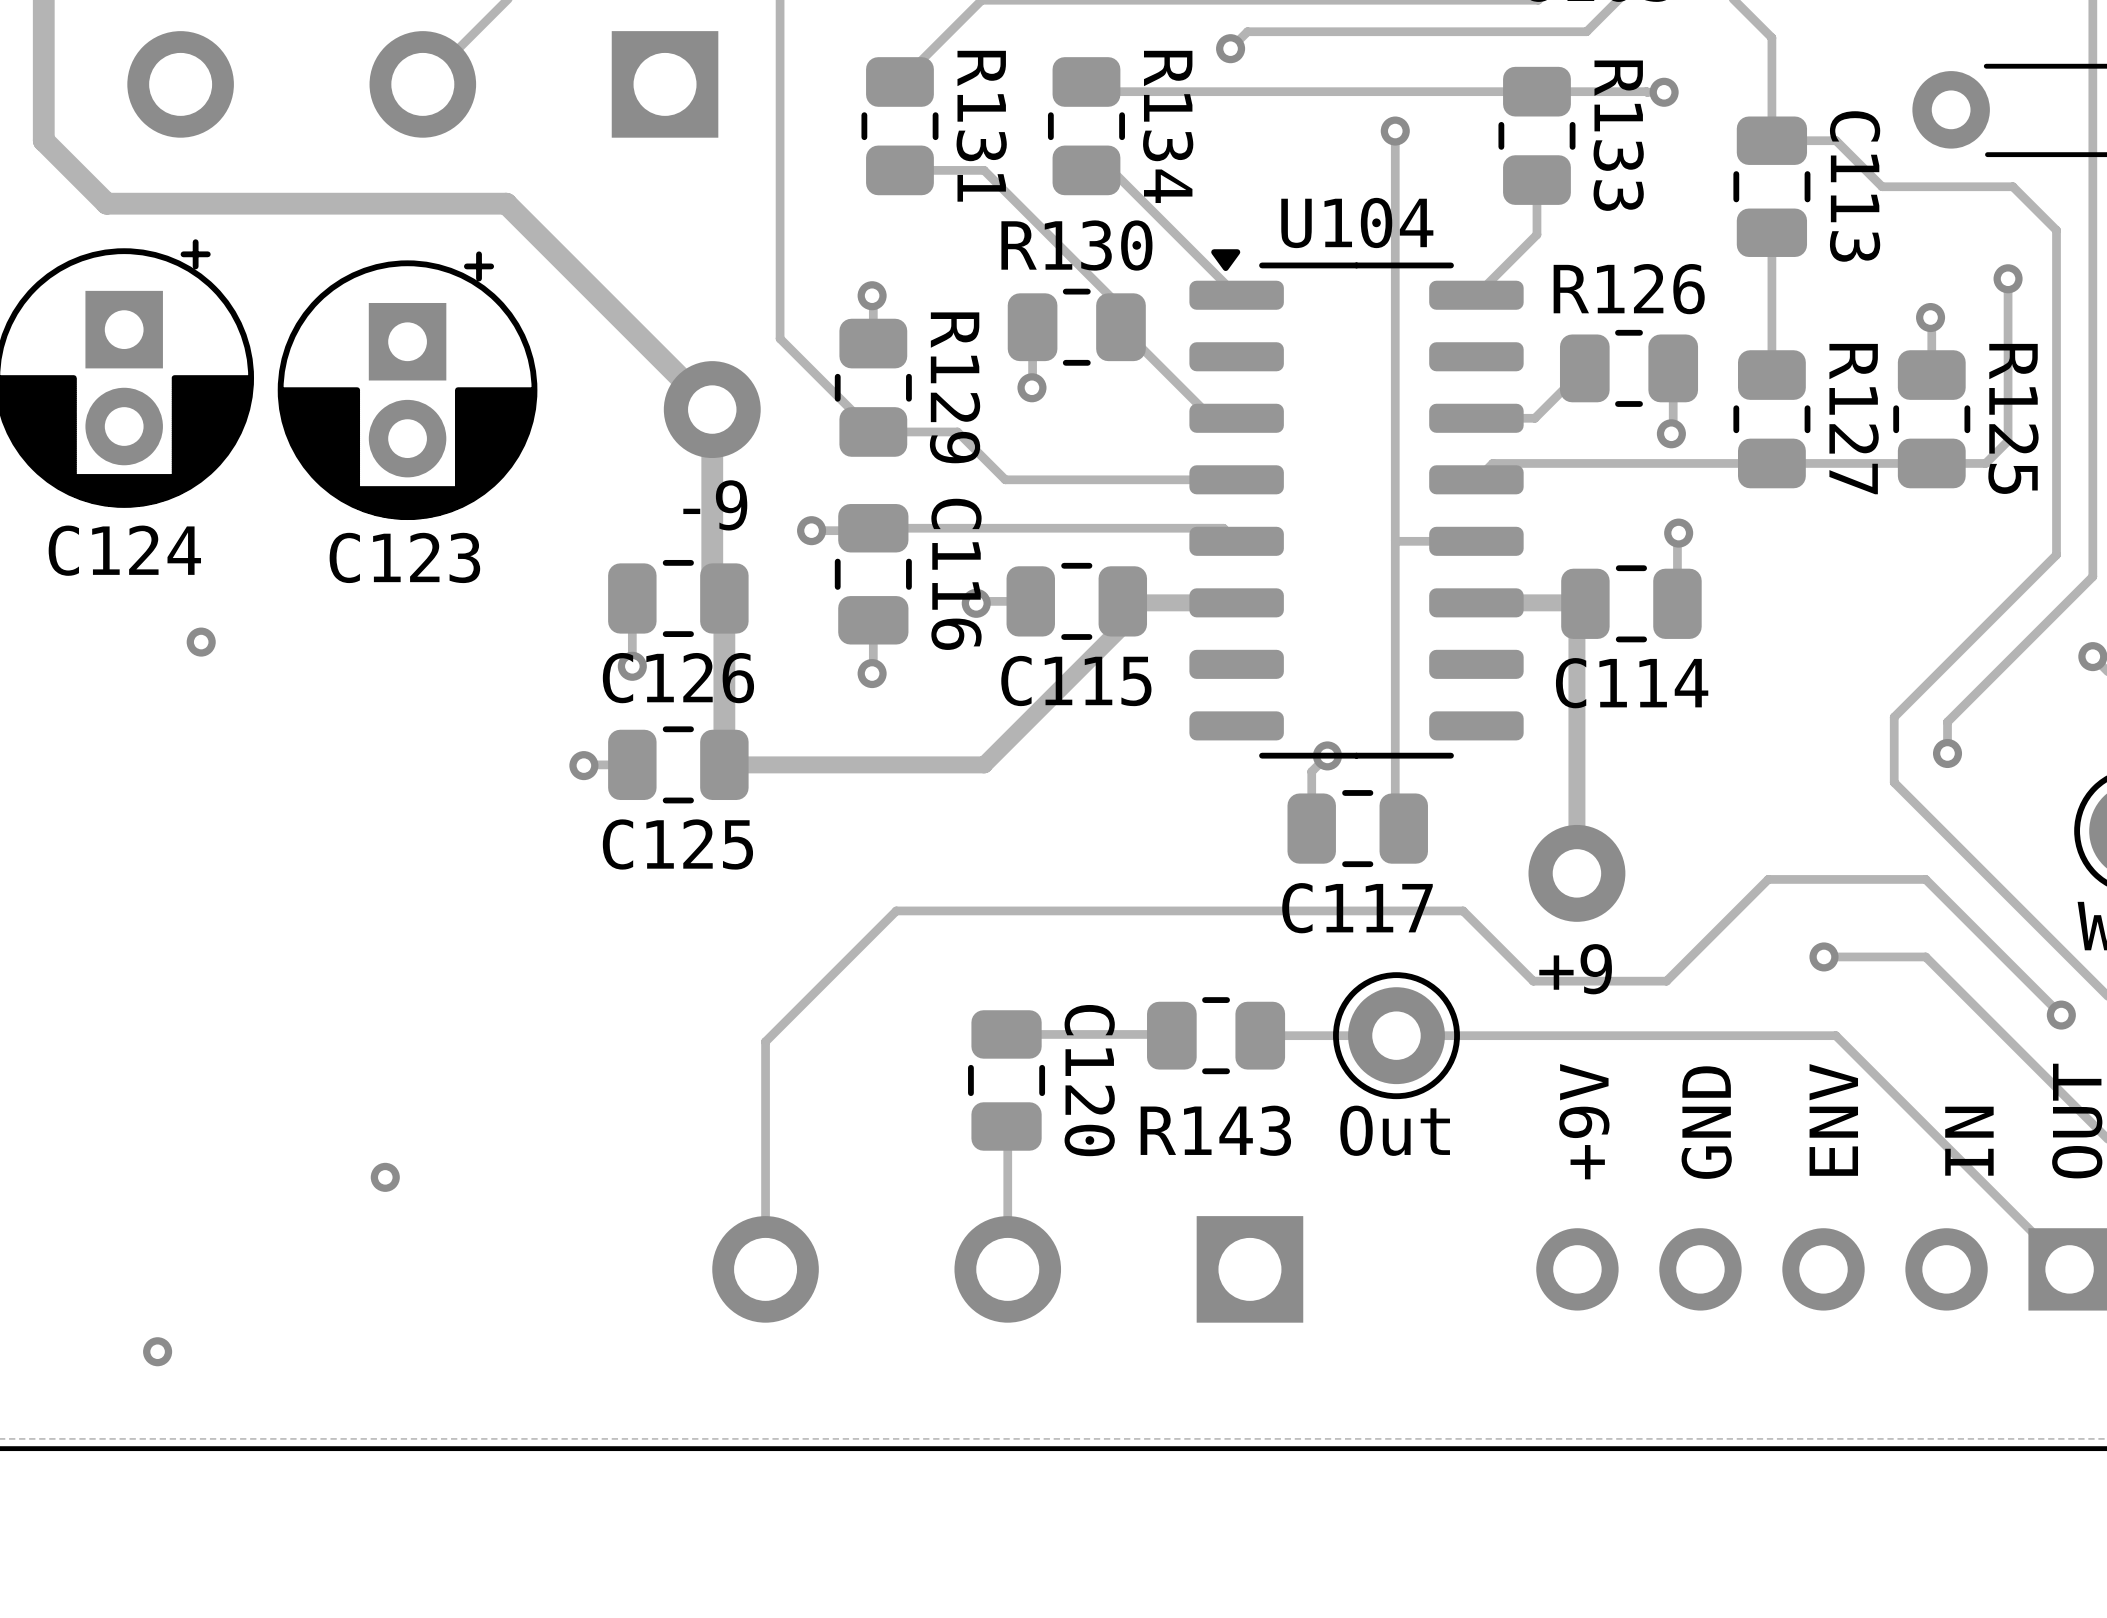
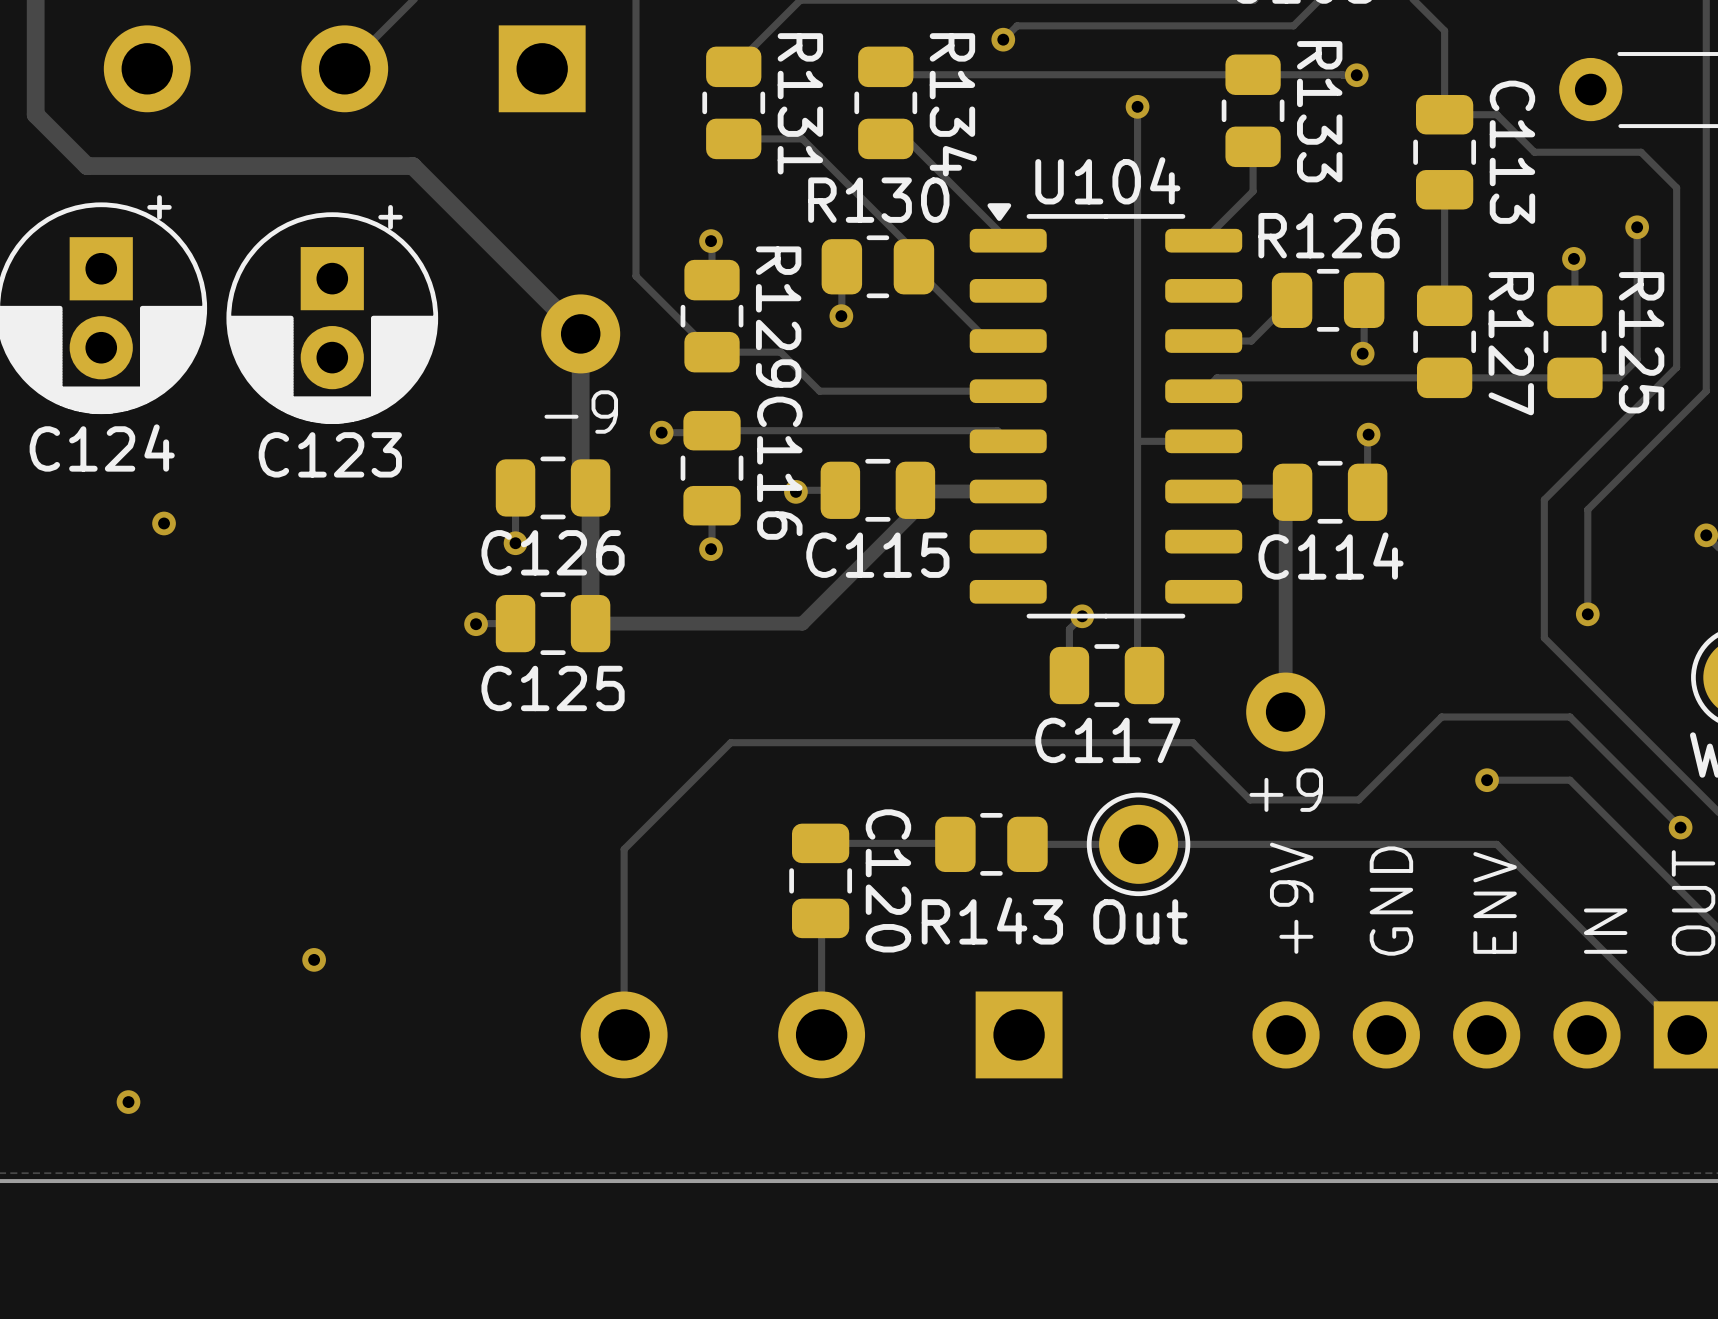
track: (2056, 450) (2056, 554) (1894, 717) -> (1676, 367) (1544, 499) (1544, 584)
track: (2092, 479) (2092, 576) (1947, 722) -> (1706, 391) (1587, 509) (1587, 588)

